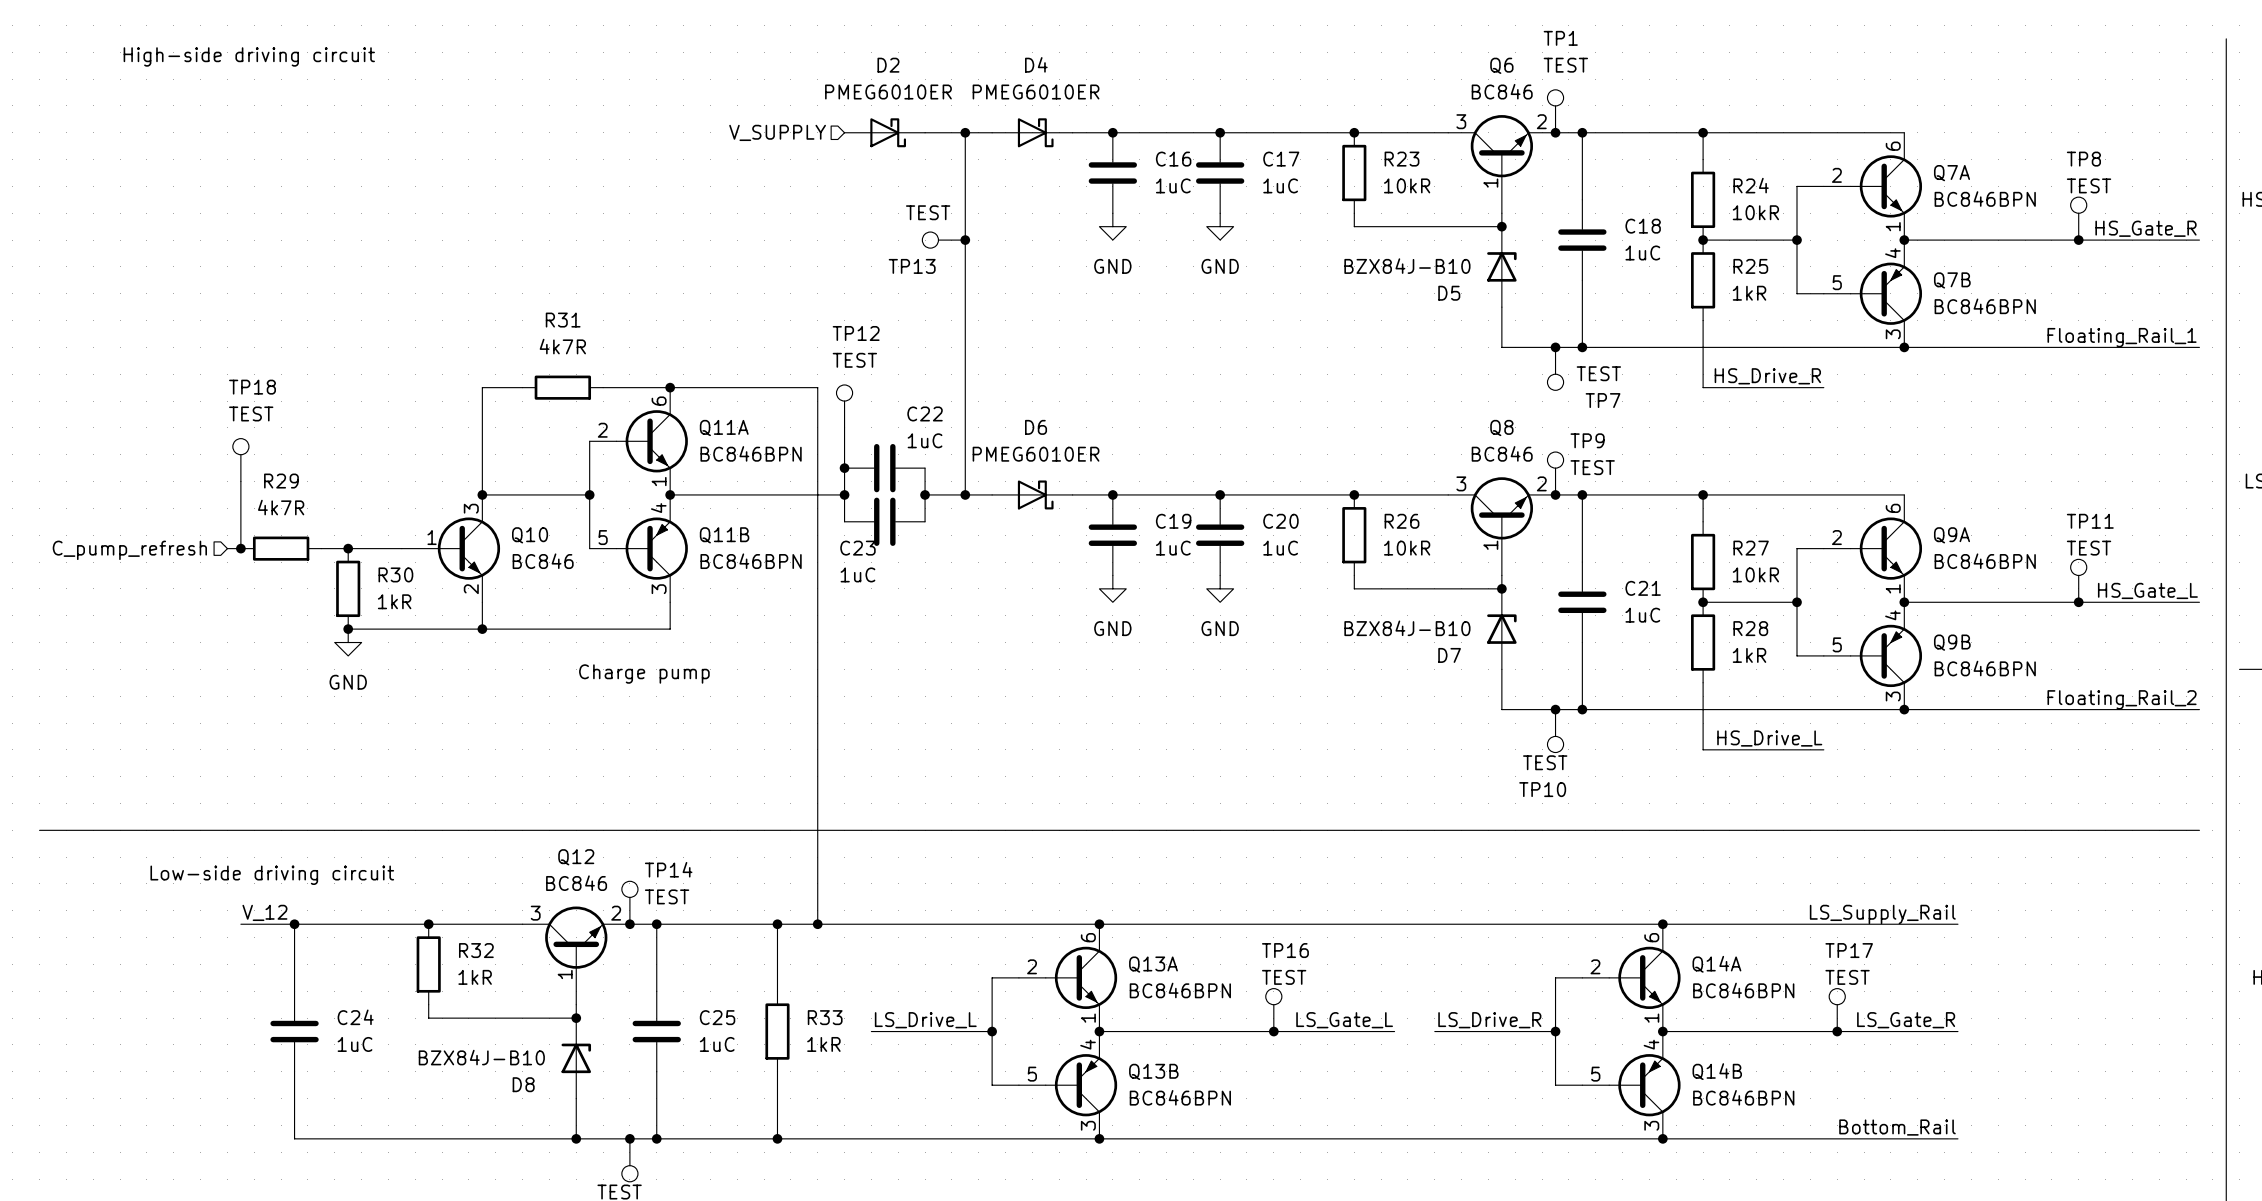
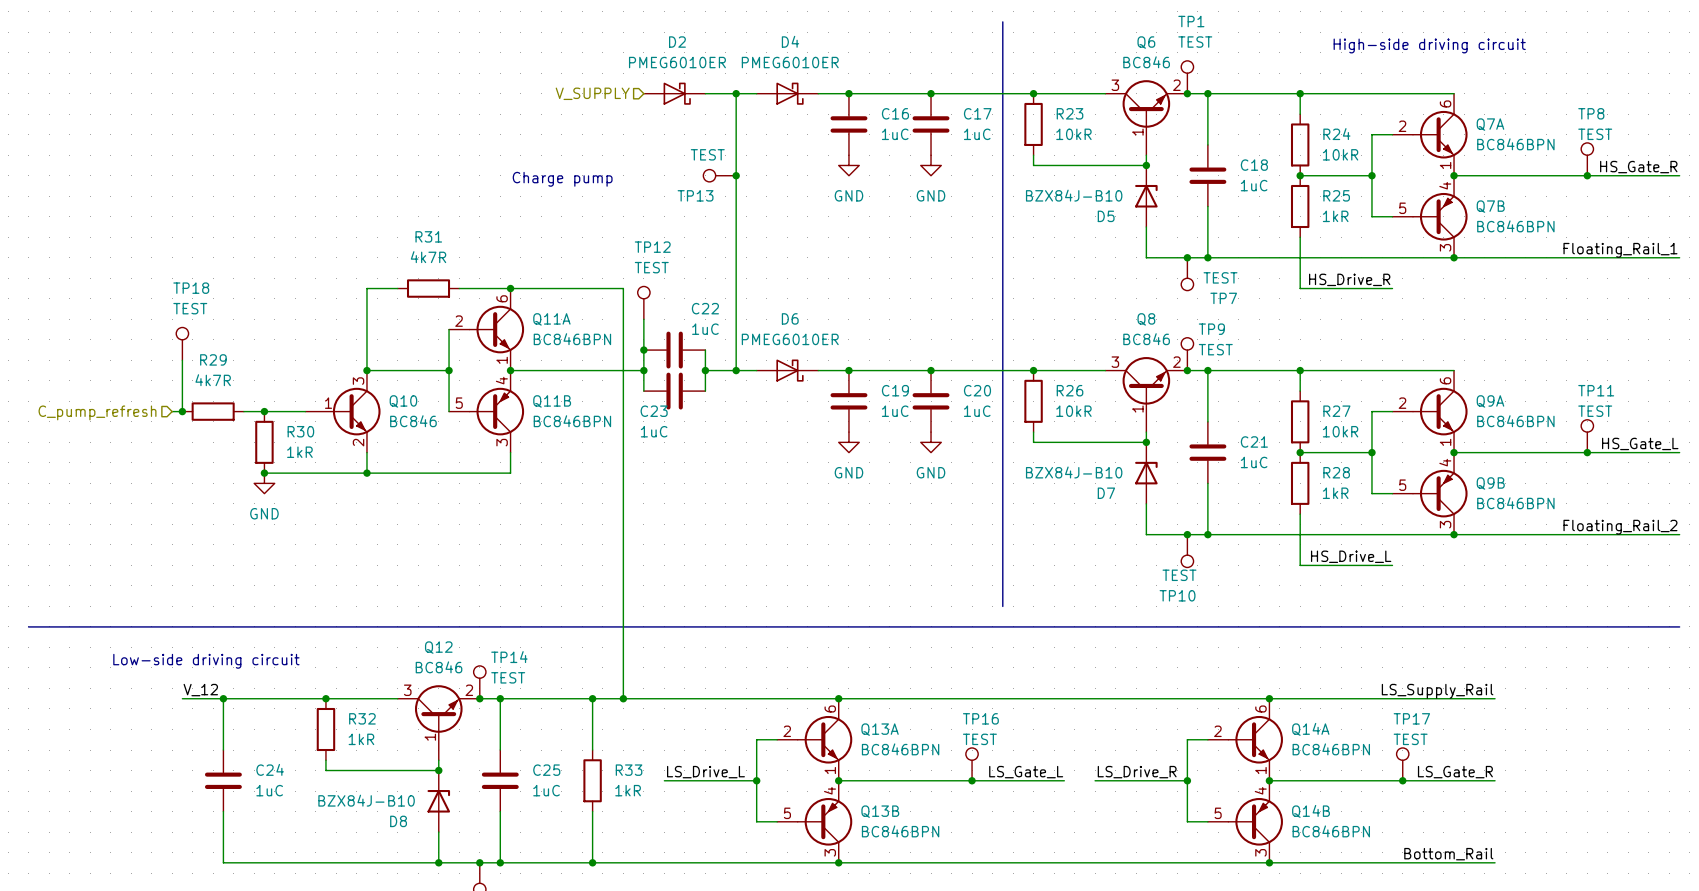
line: none -> (1002, 21) (1002, 606)
text: High-side driving circuit (249, 56) -> none
text: none -> High-side driving circuit (1429, 45)
text: none -> Charge pump (562, 179)
text: Charge pump (644, 674) -> none

